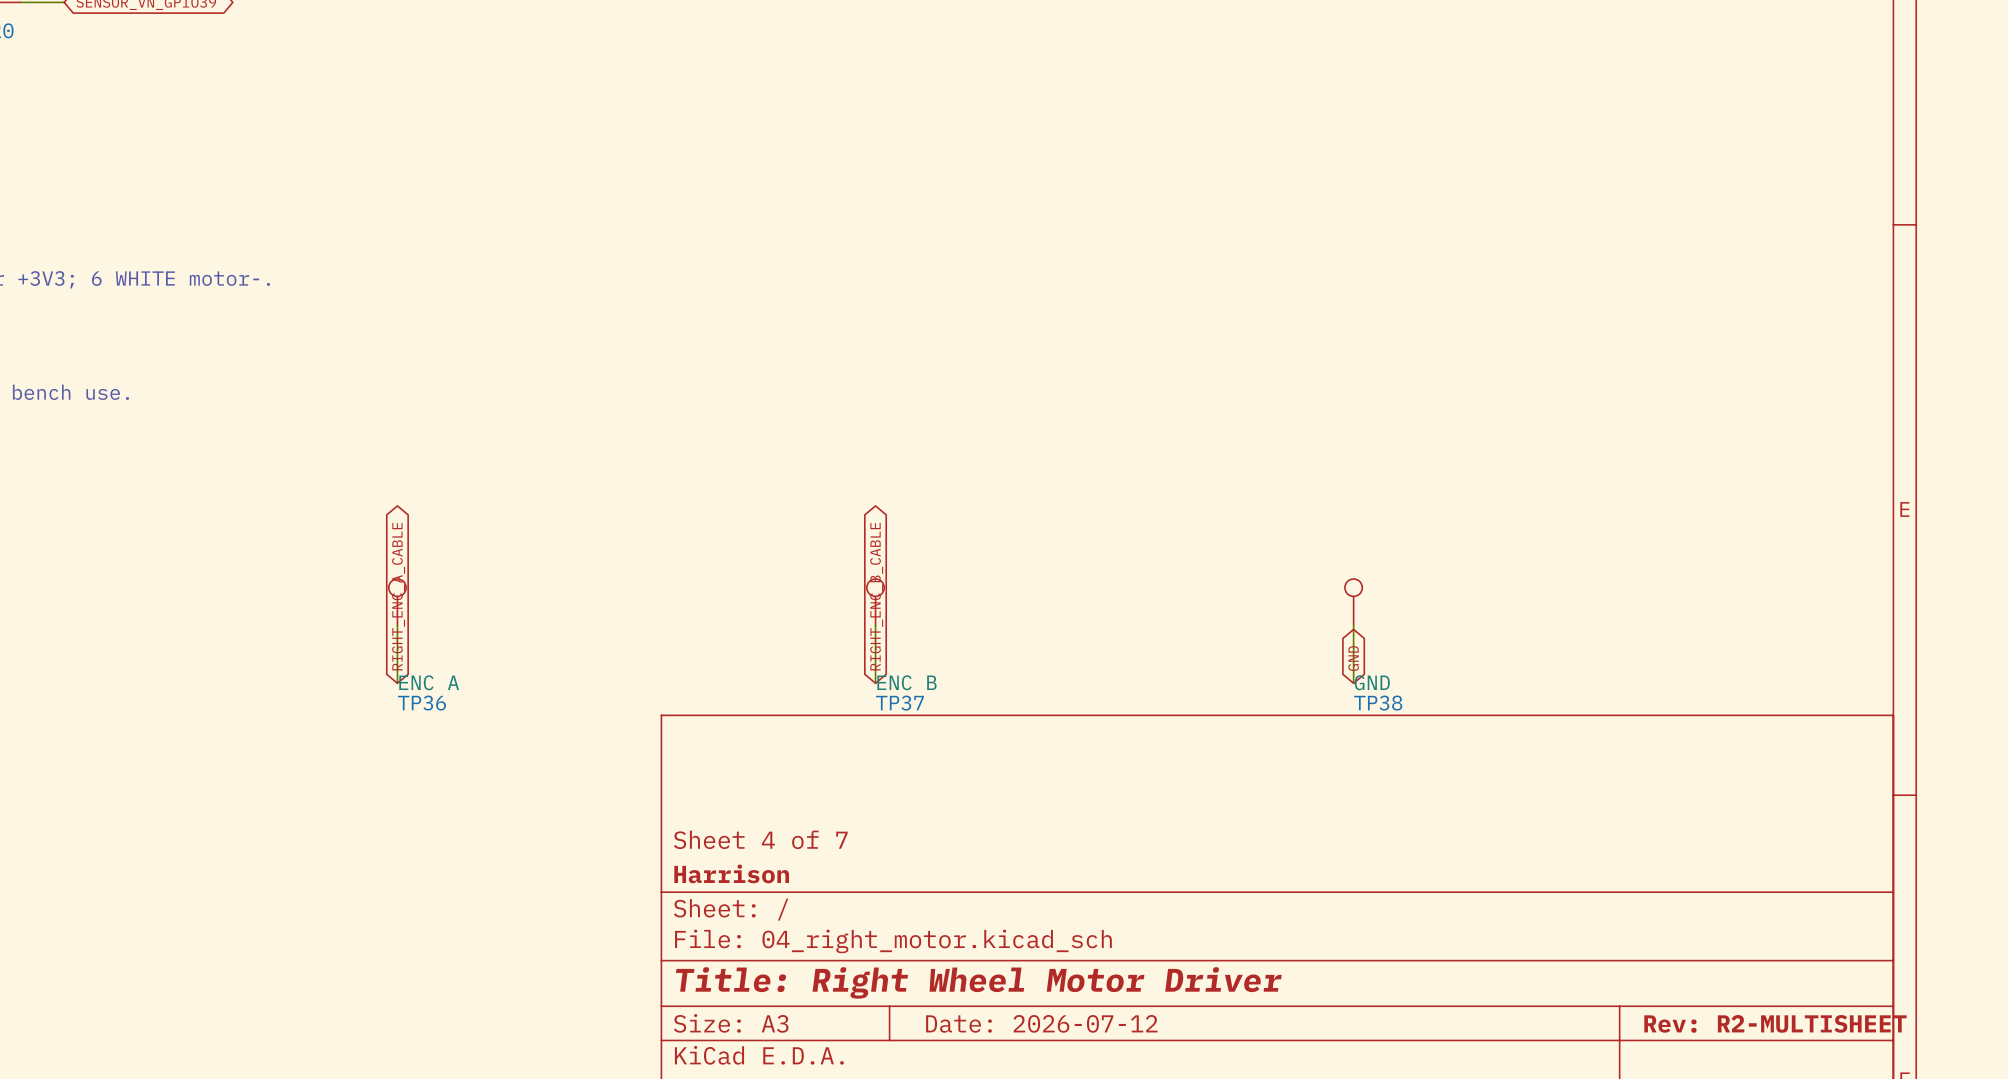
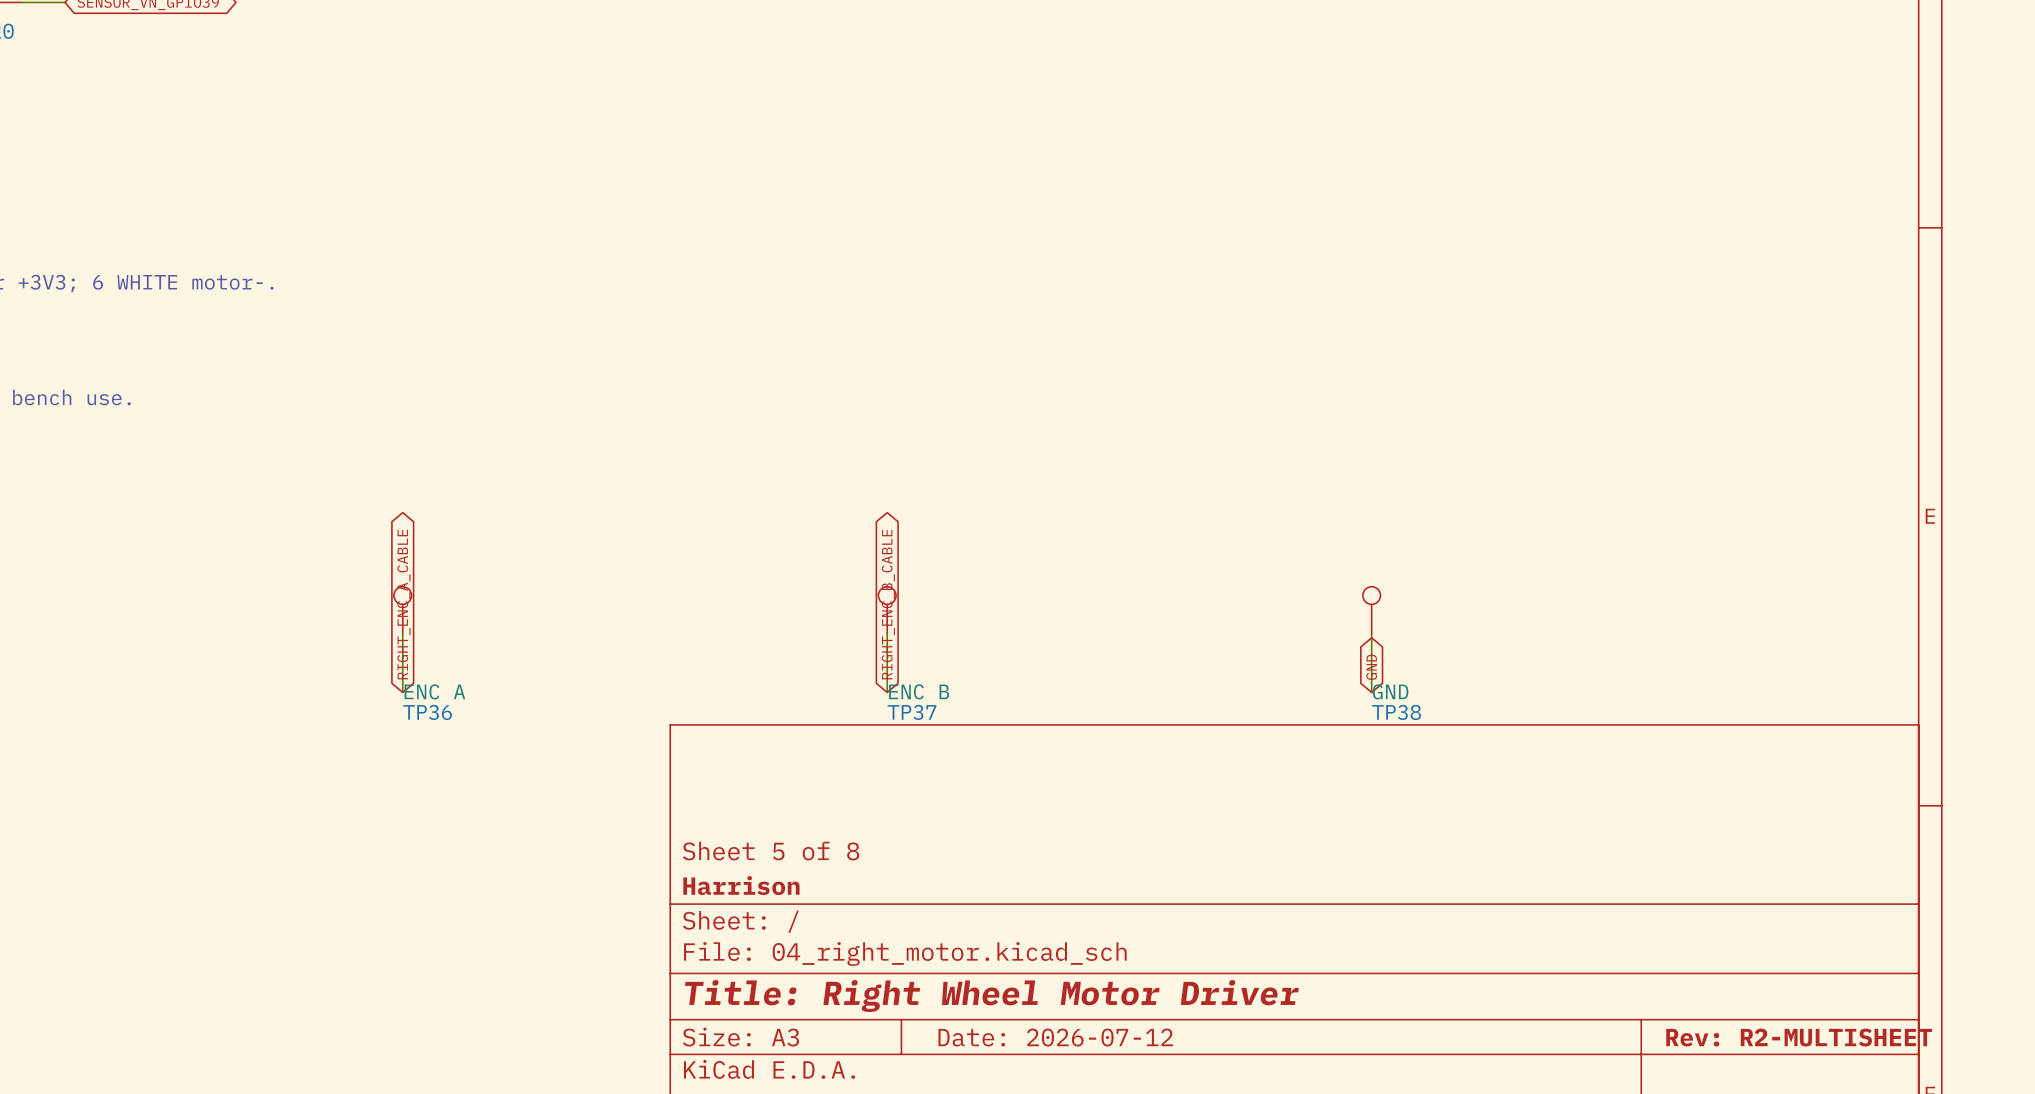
title block: Sheet 4 of 7 (760, 839) -> Sheet 5 of 8 (771, 851)

